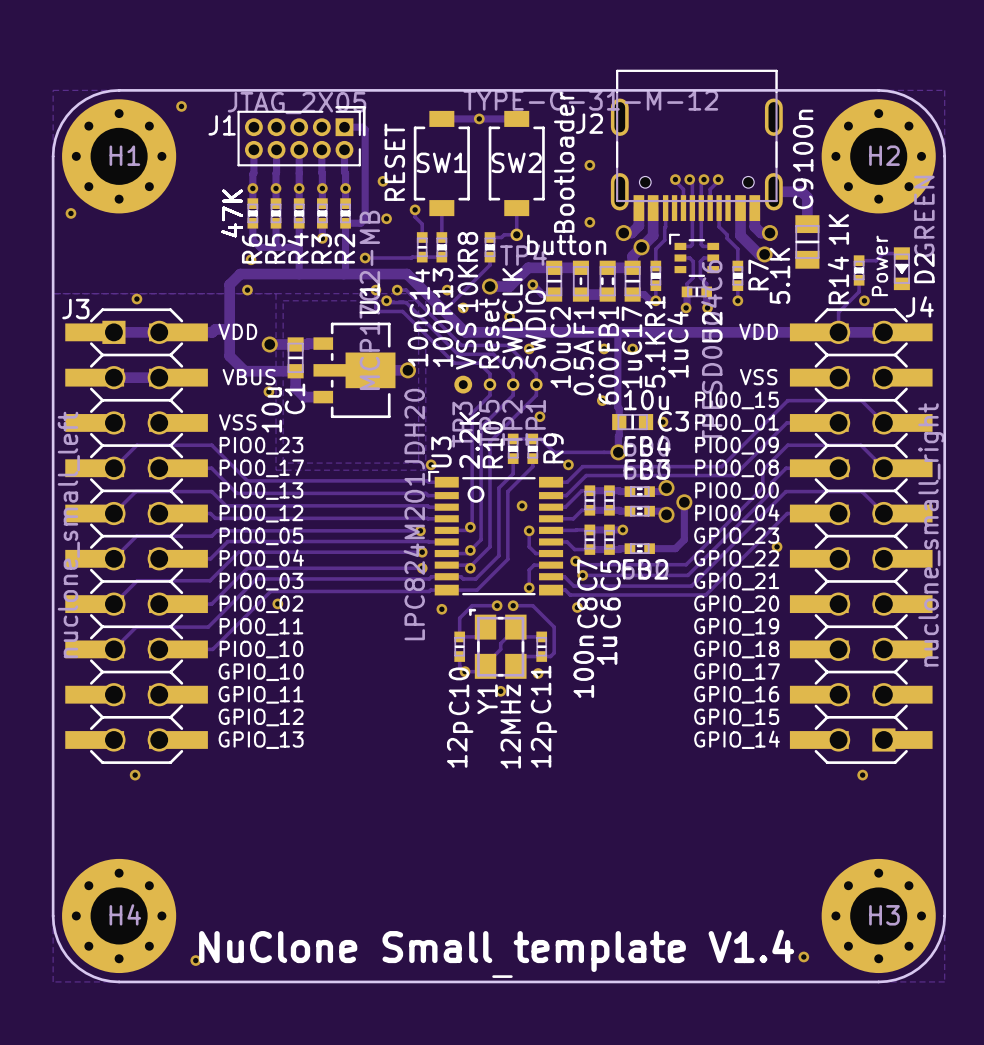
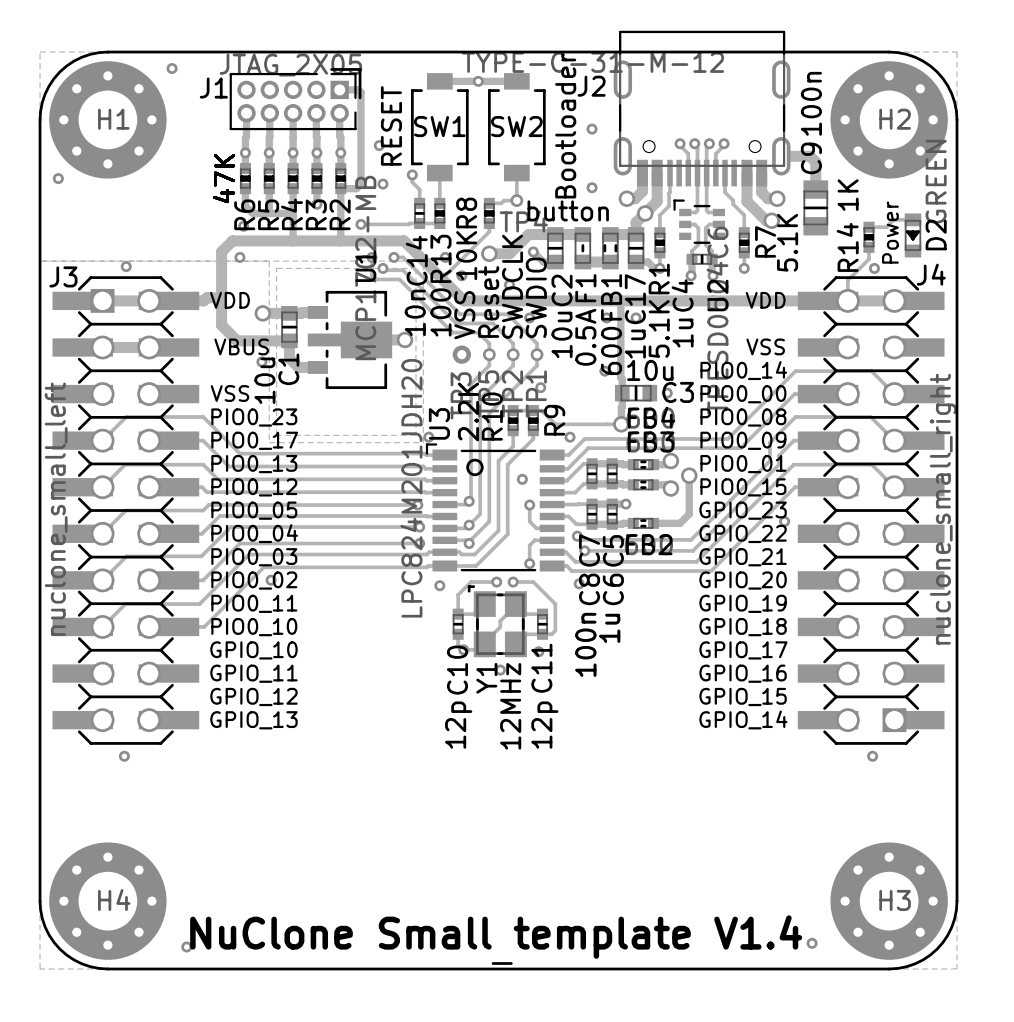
J4 text: PIO0_15 (737, 400) -> PIO0_14 (743, 370)
J4 text: PIO0_01 (737, 423) -> PIO0_00 (743, 394)
J4 text: PIO0_09 (737, 445) -> PIO0_08 (743, 417)
J4 text: PIO0_08 (737, 468) -> PIO0_09 (743, 440)
J4 text: PIO0_00 (737, 491) -> PIO0_01 (743, 464)
J4 text: PIO0_04 (737, 513) -> PIO0_15 (743, 487)

